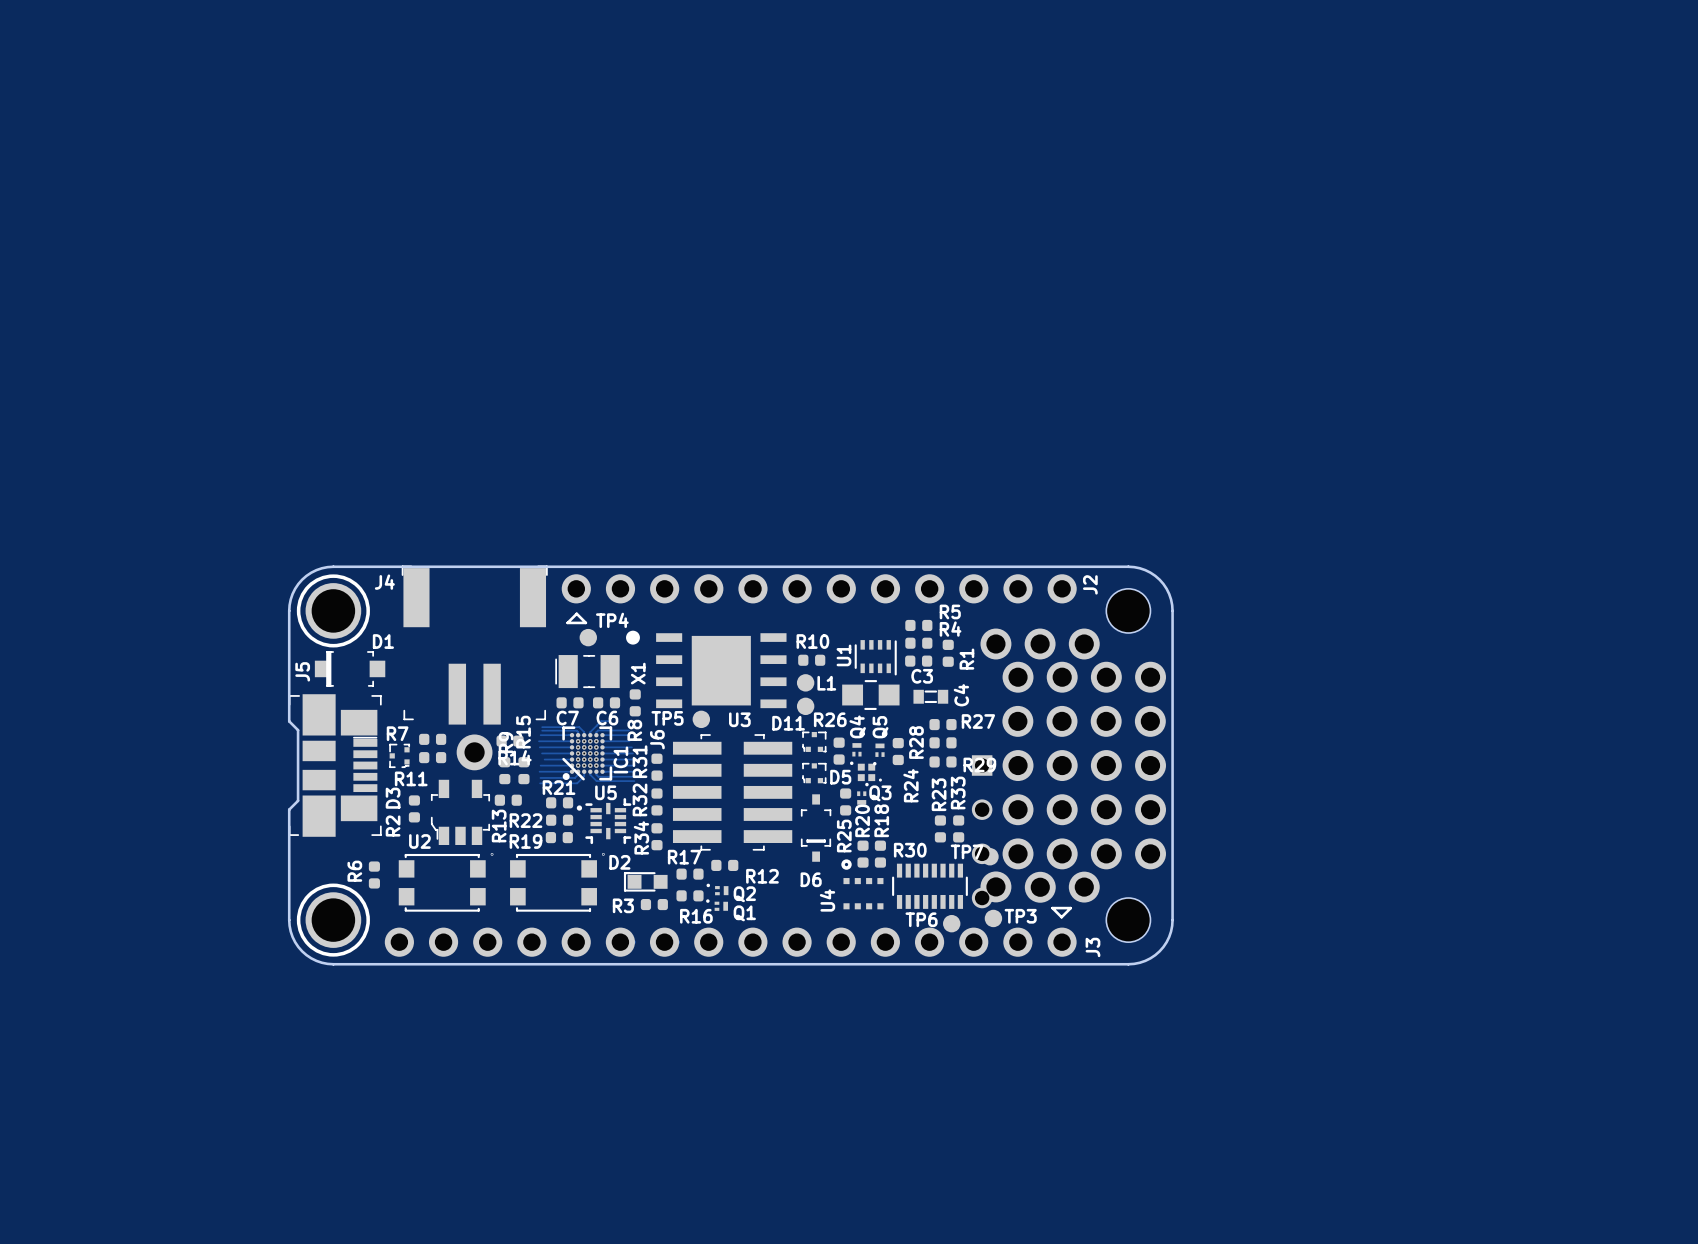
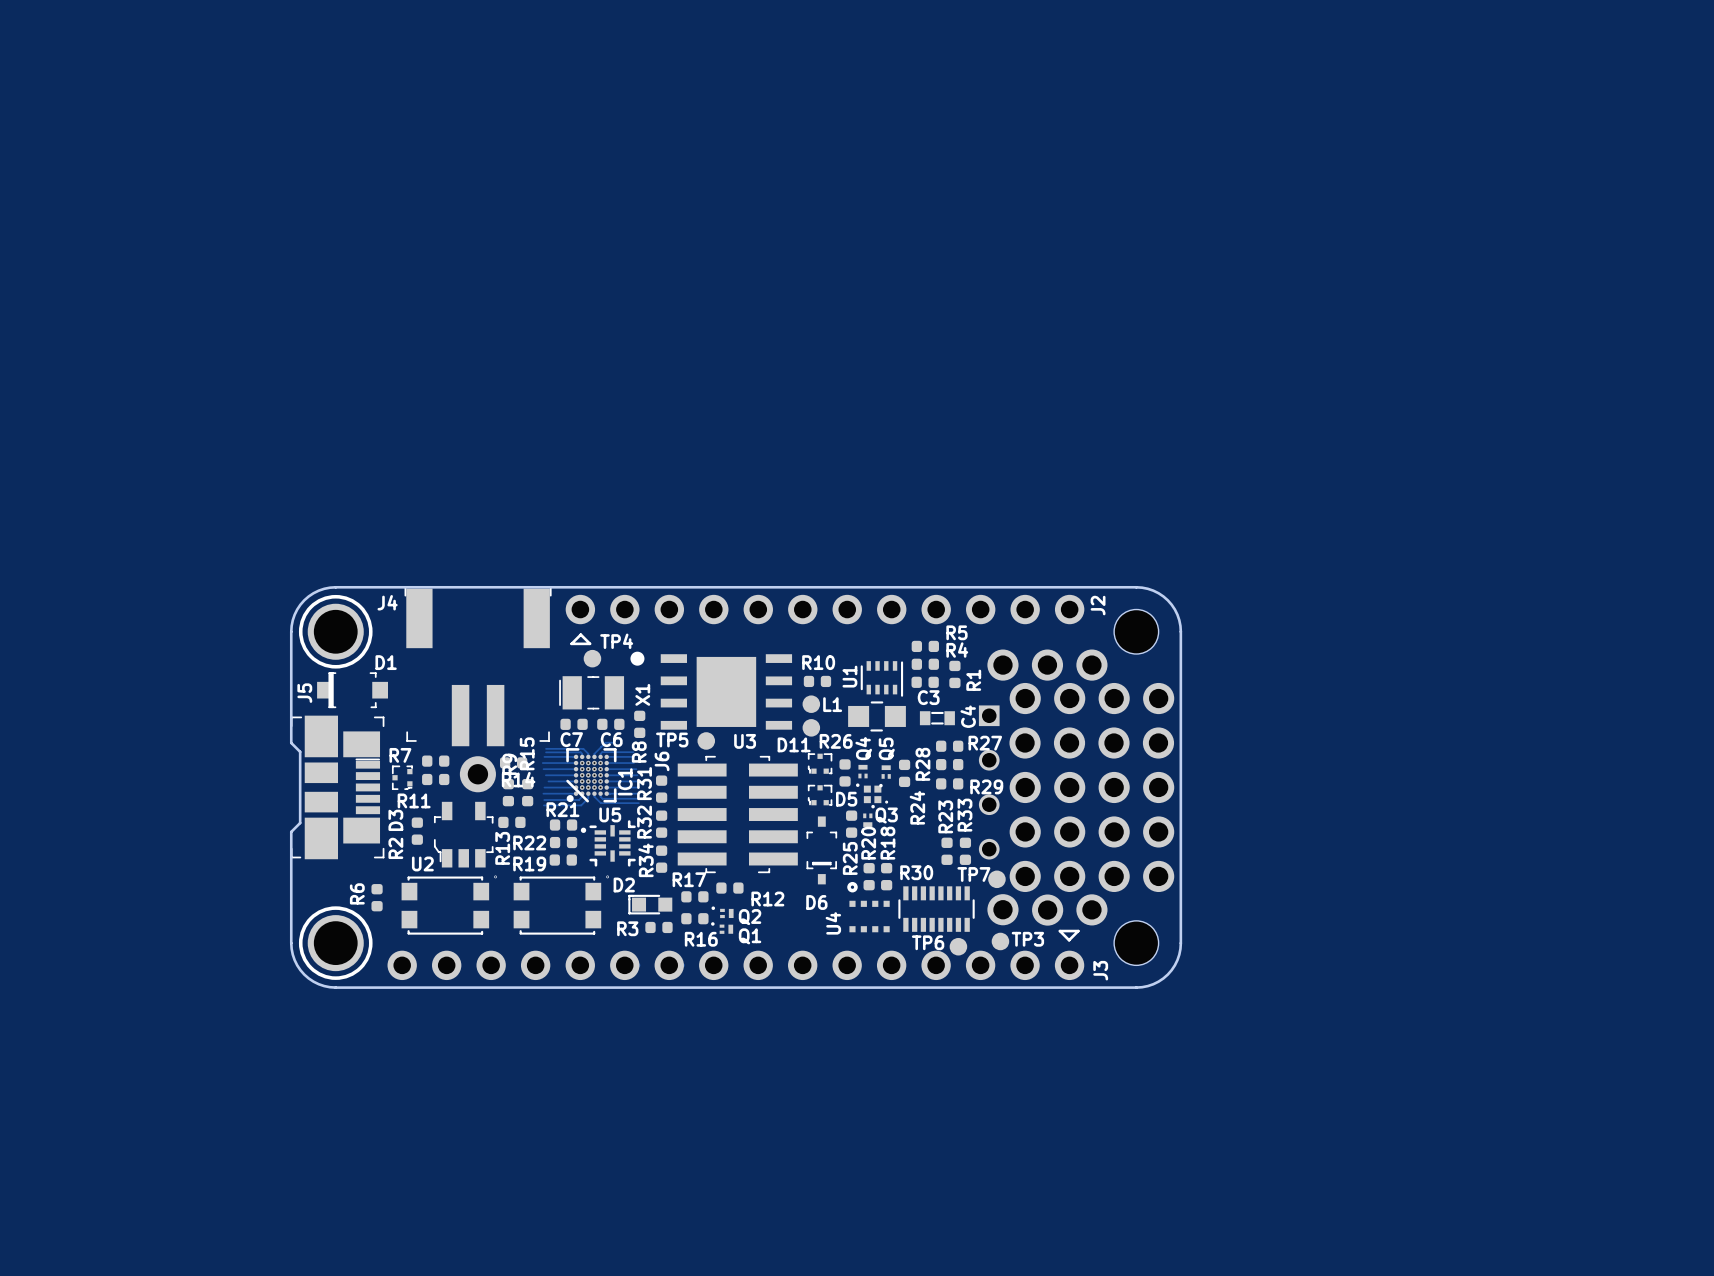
part position: (982, 831) -> (989, 782)

